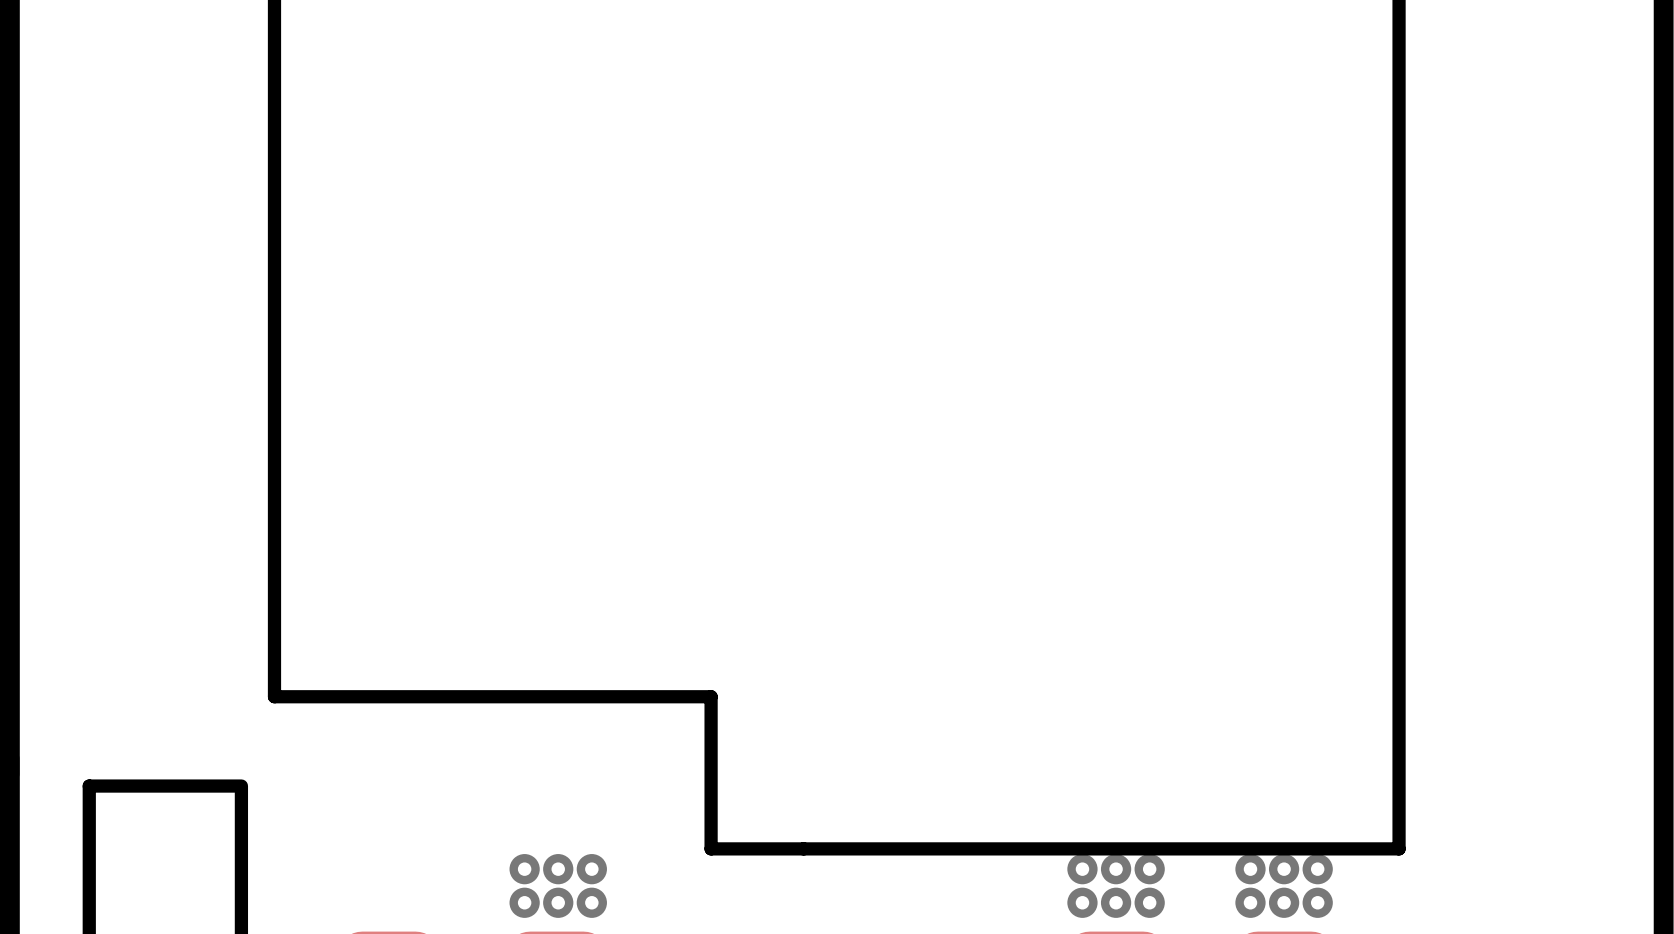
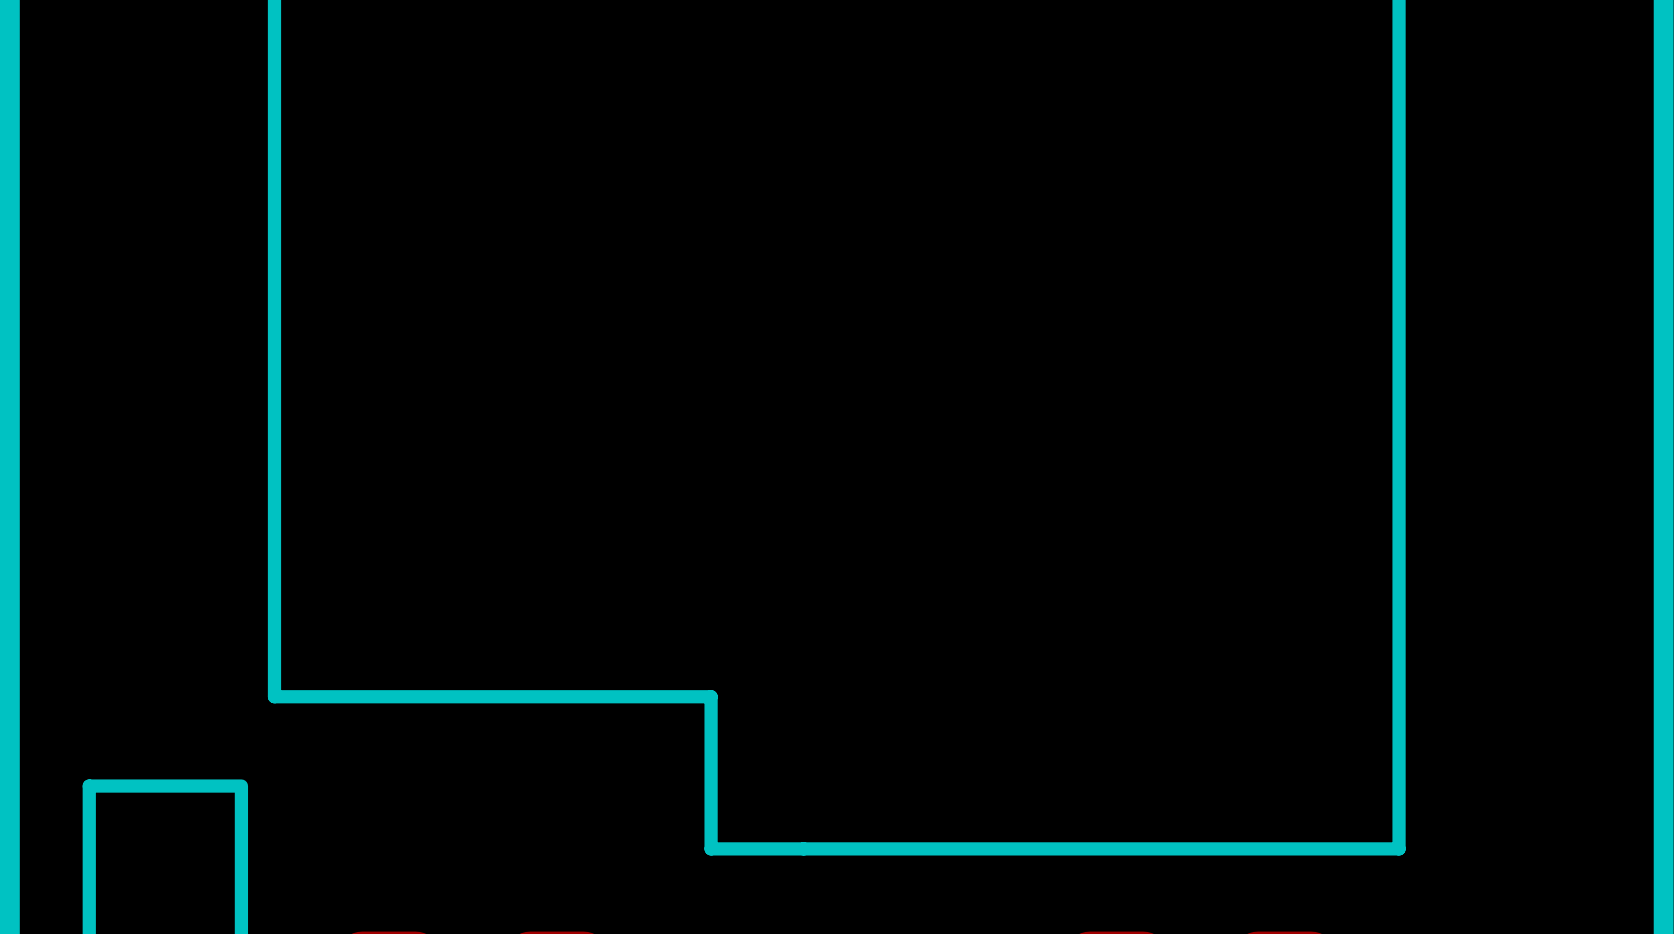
via: (524, 869) -> none
via: (558, 869) -> none
via: (591, 869) -> none
via: (1082, 869) -> none
via: (1116, 869) -> none
via: (1149, 869) -> none
via: (1250, 869) -> none
via: (1284, 869) -> none
via: (1317, 869) -> none
via: (524, 902) -> none
via: (558, 902) -> none
via: (591, 902) -> none
via: (1082, 902) -> none
via: (1116, 902) -> none
via: (1149, 902) -> none
via: (1250, 902) -> none
via: (1284, 902) -> none
via: (1317, 902) -> none

